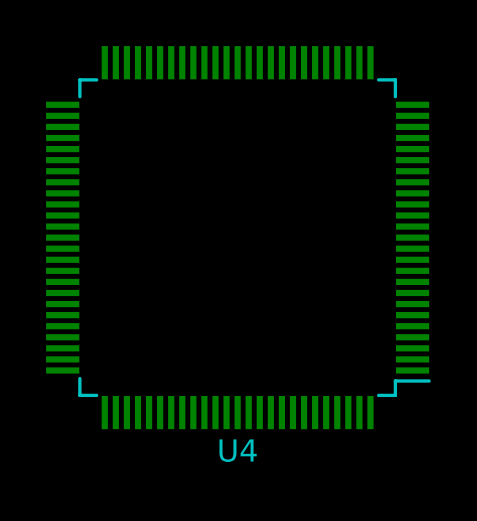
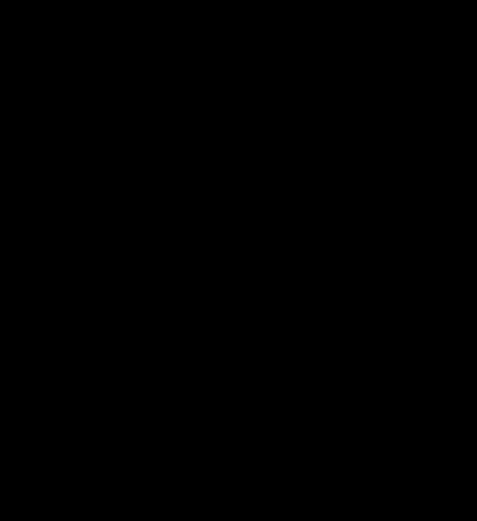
U4: (238, 237) -> none

